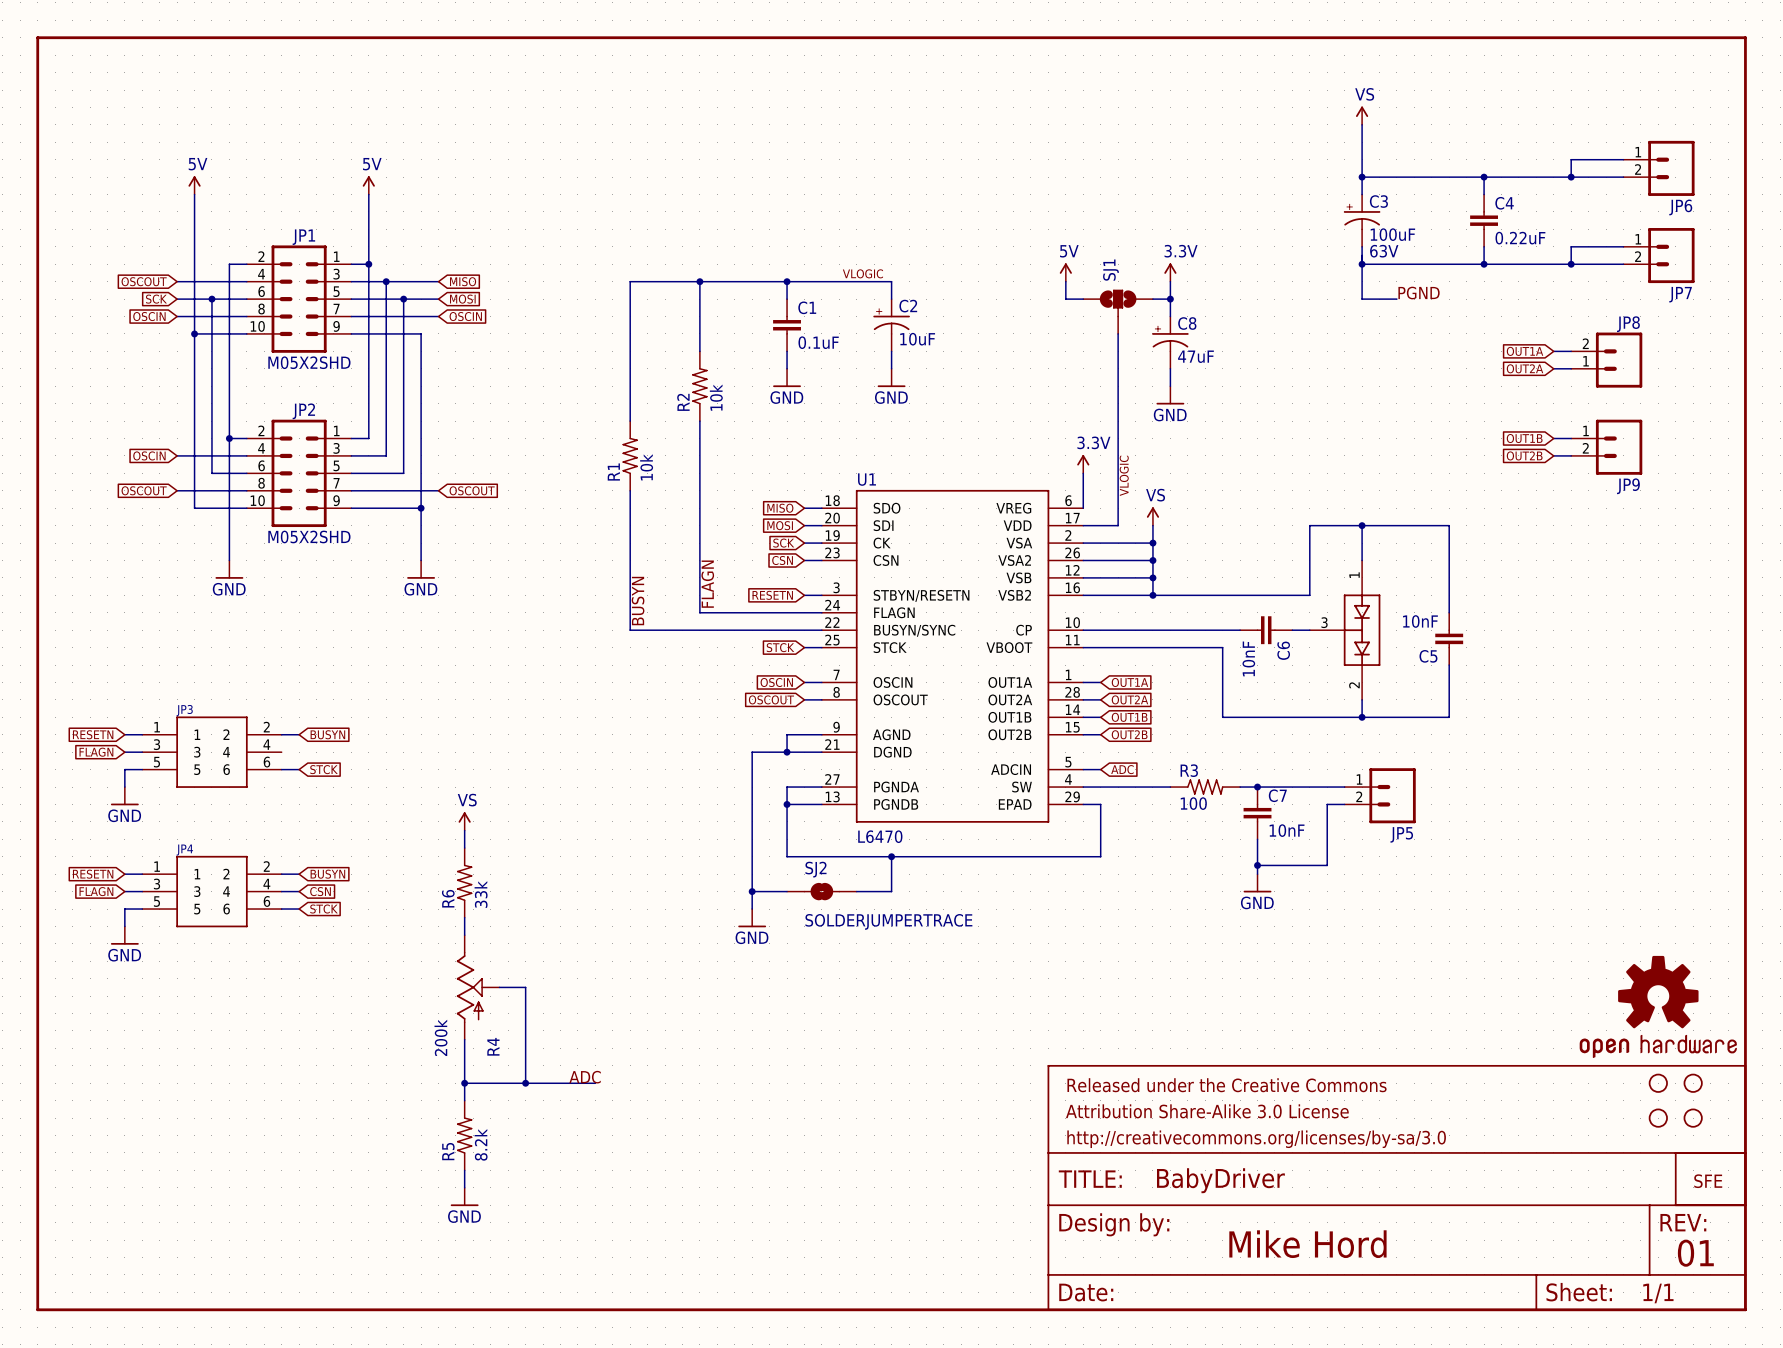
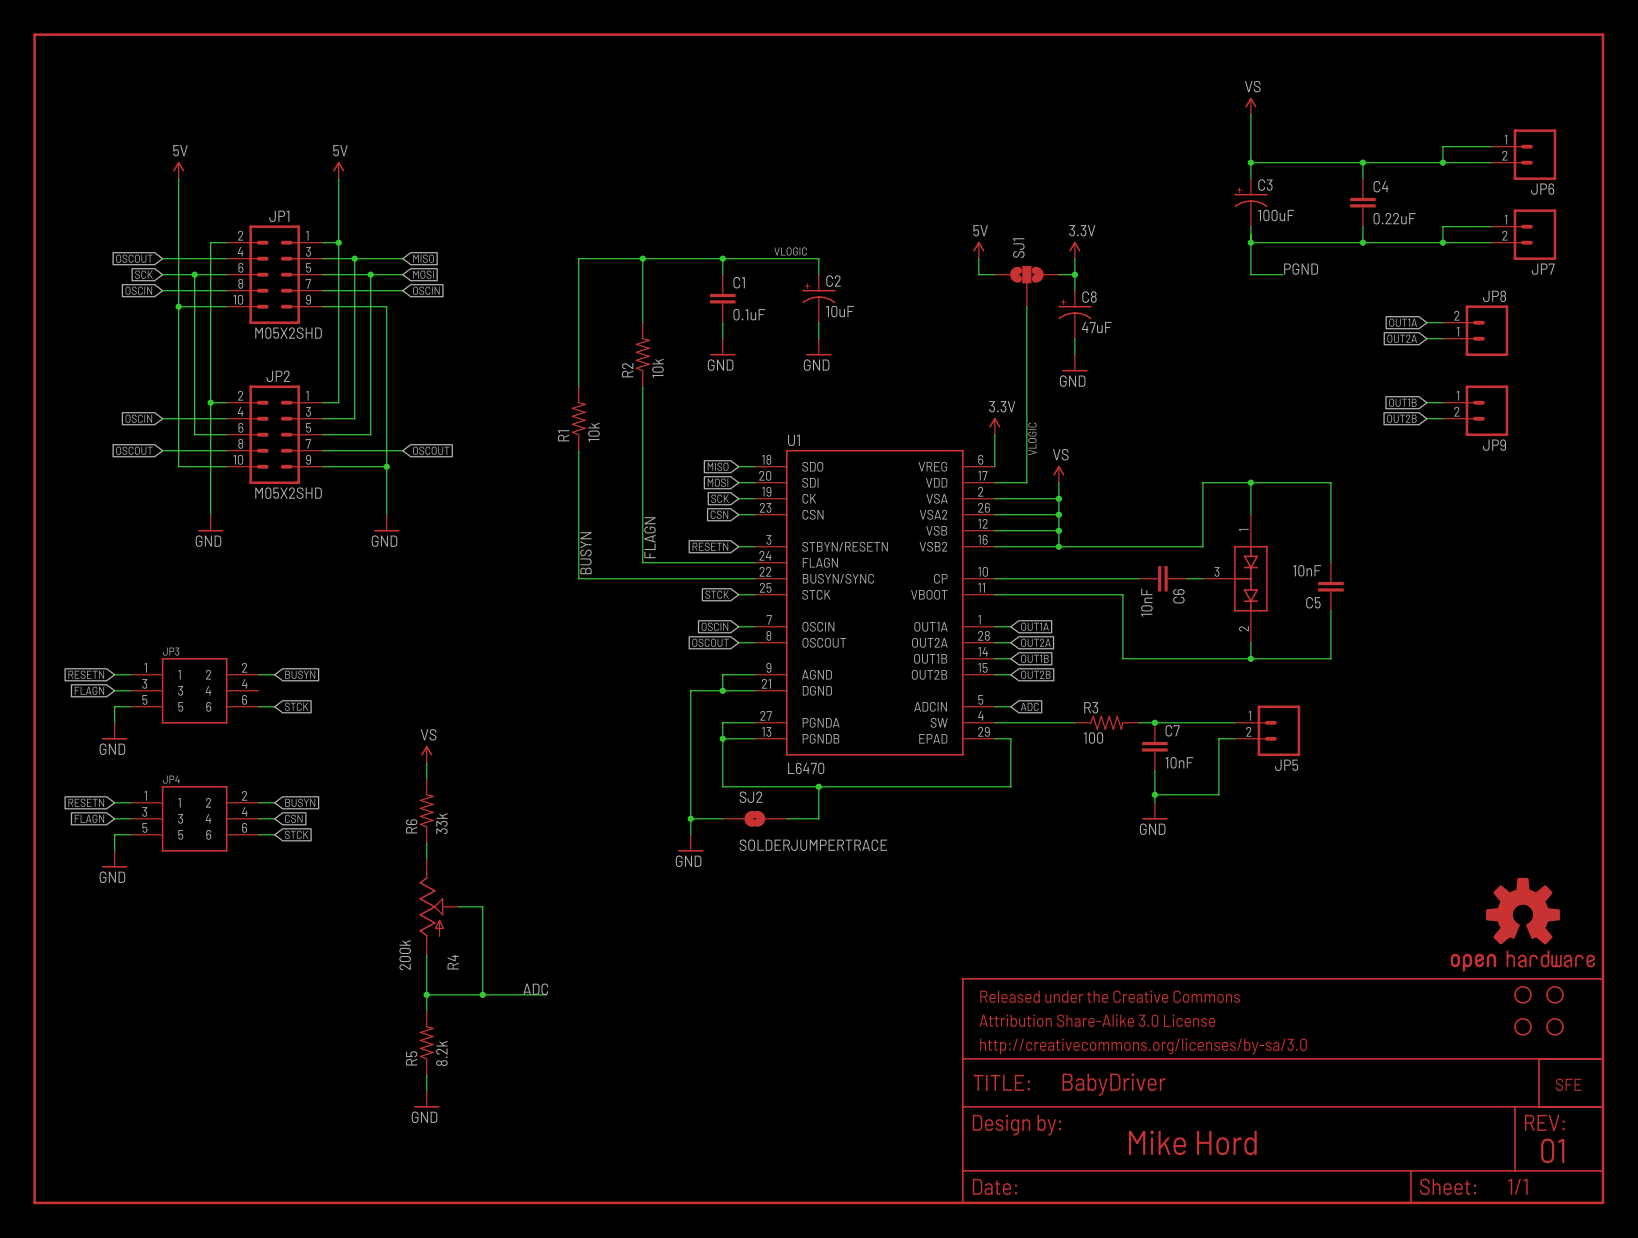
text: 63V (1384, 251) -> none

